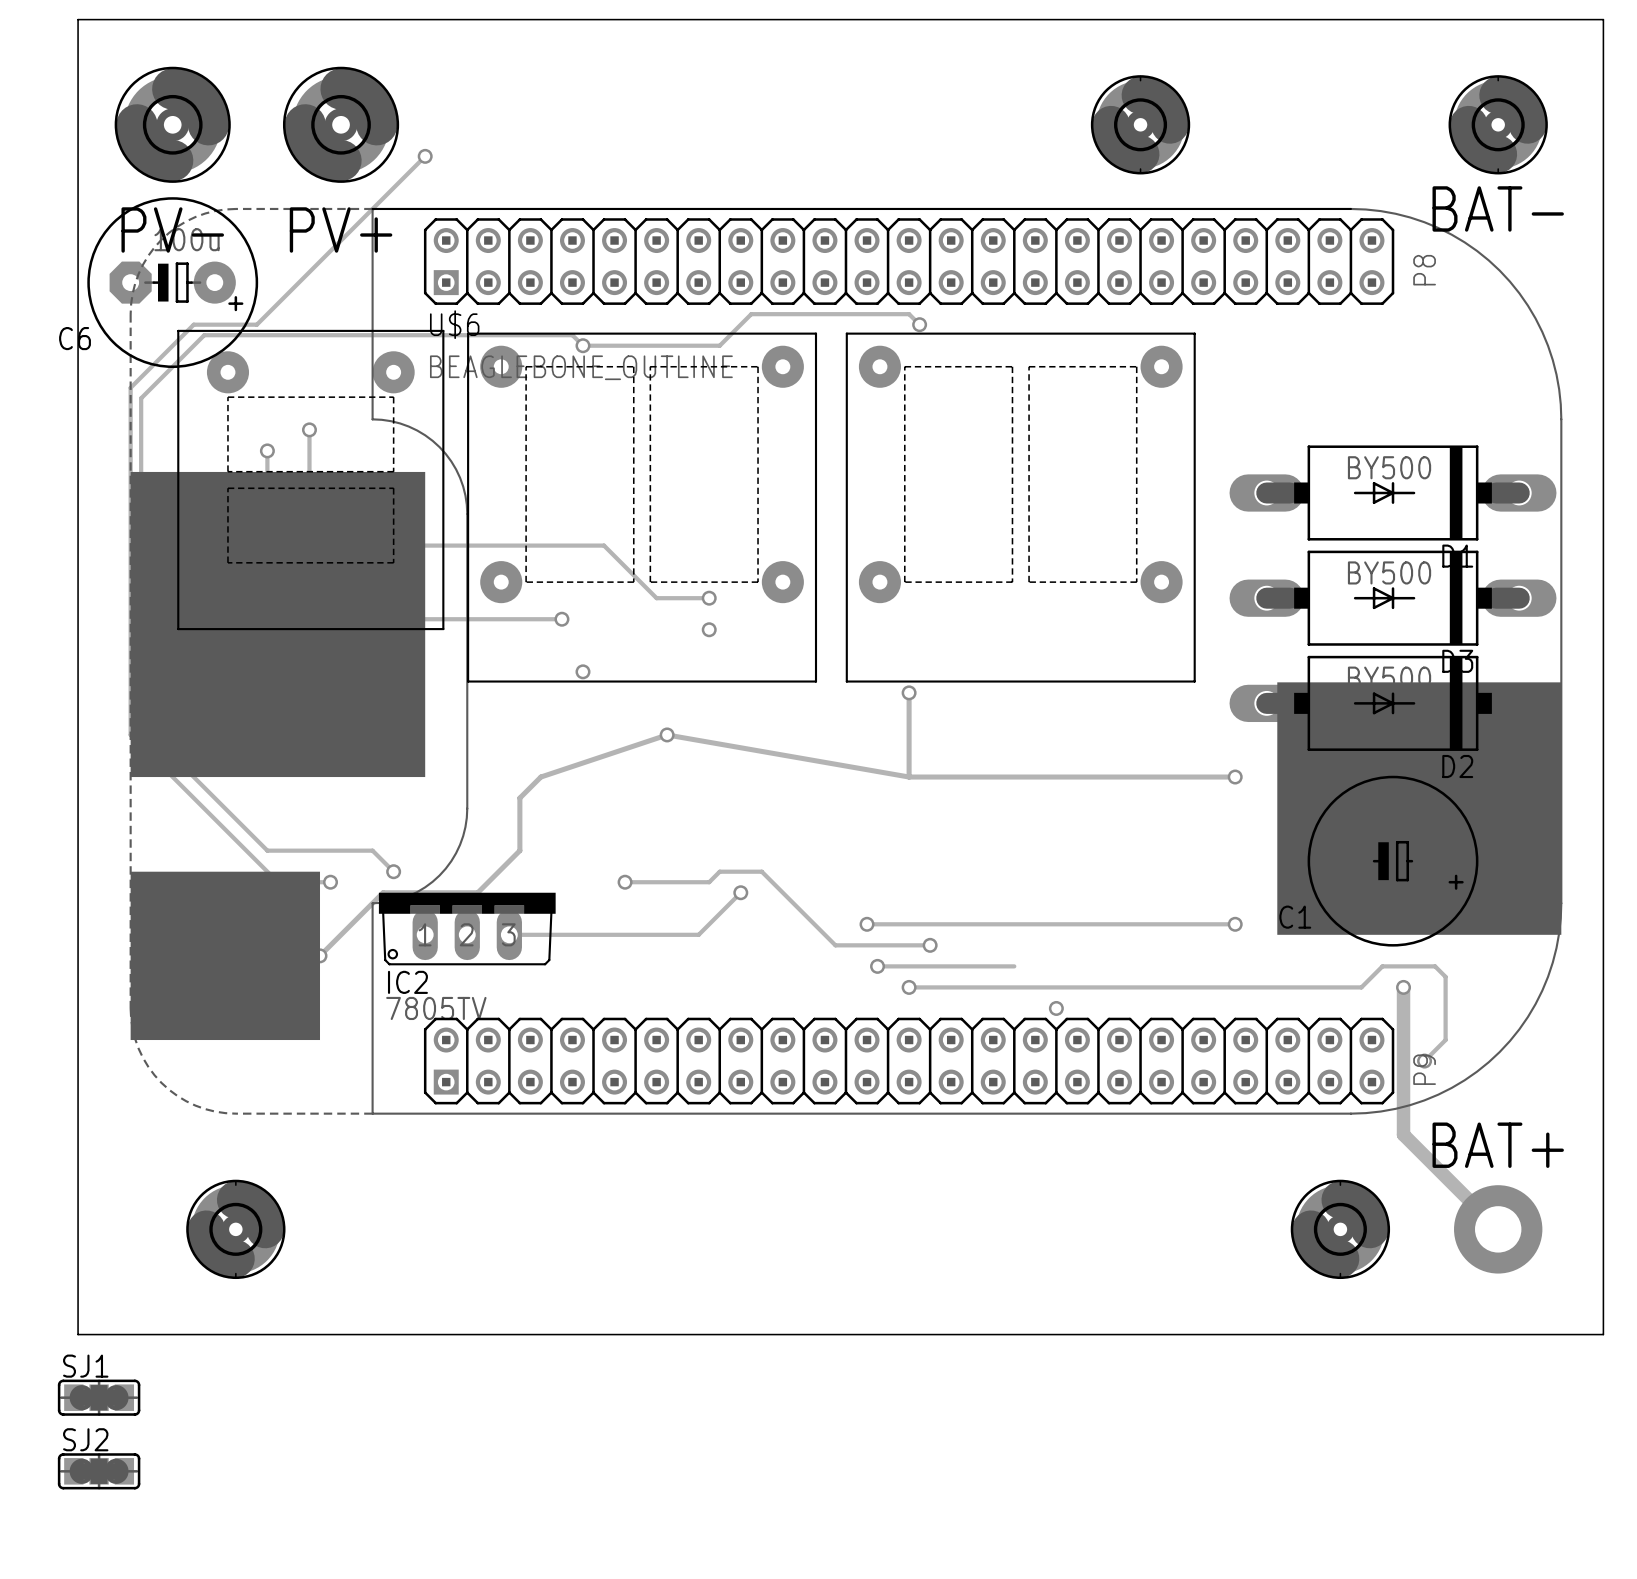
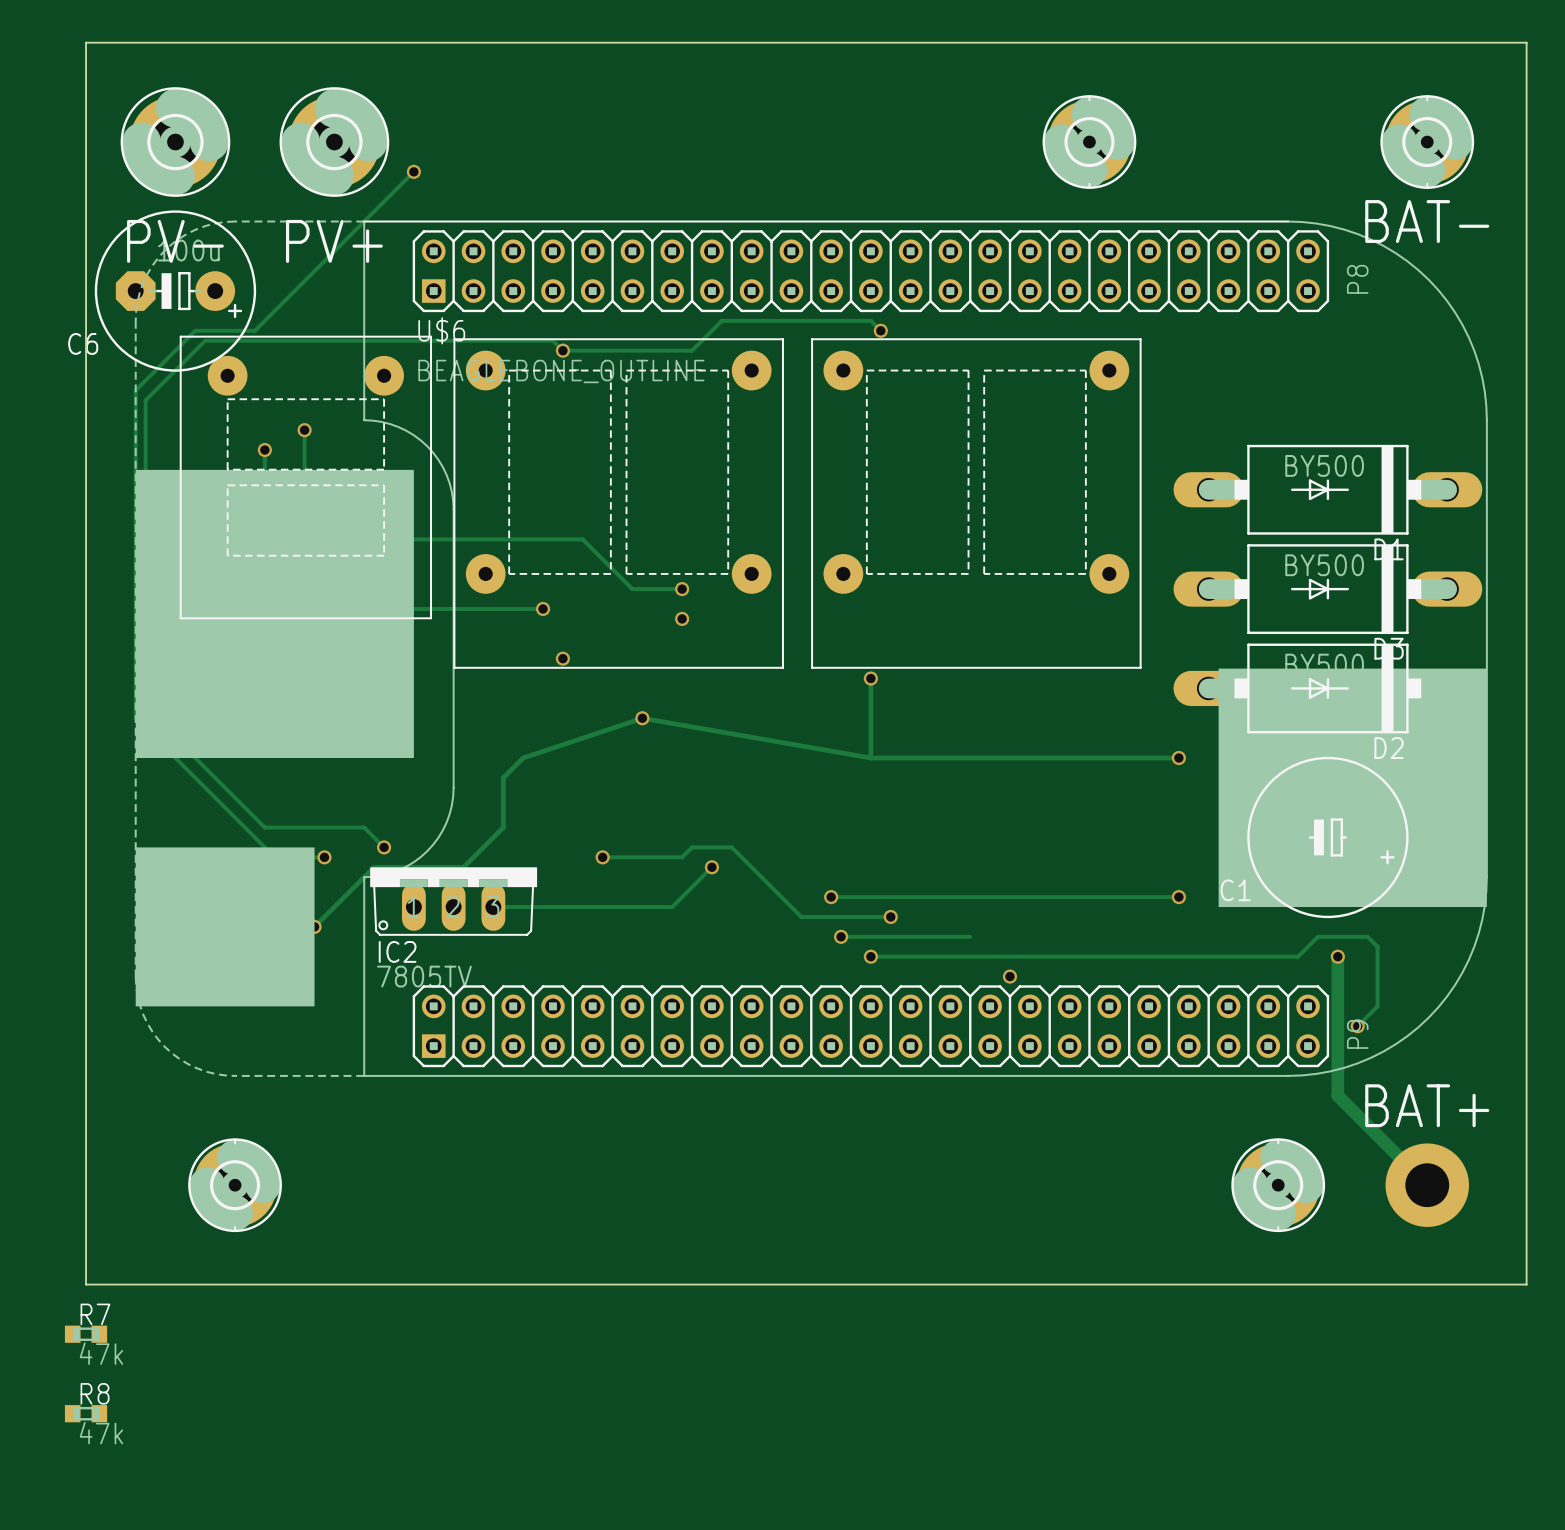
R7: none -> 47k (86, 1334)
SJ1: (99, 1397) -> none
R8: none -> 47k (86, 1413)
SJ2: (99, 1471) -> none

